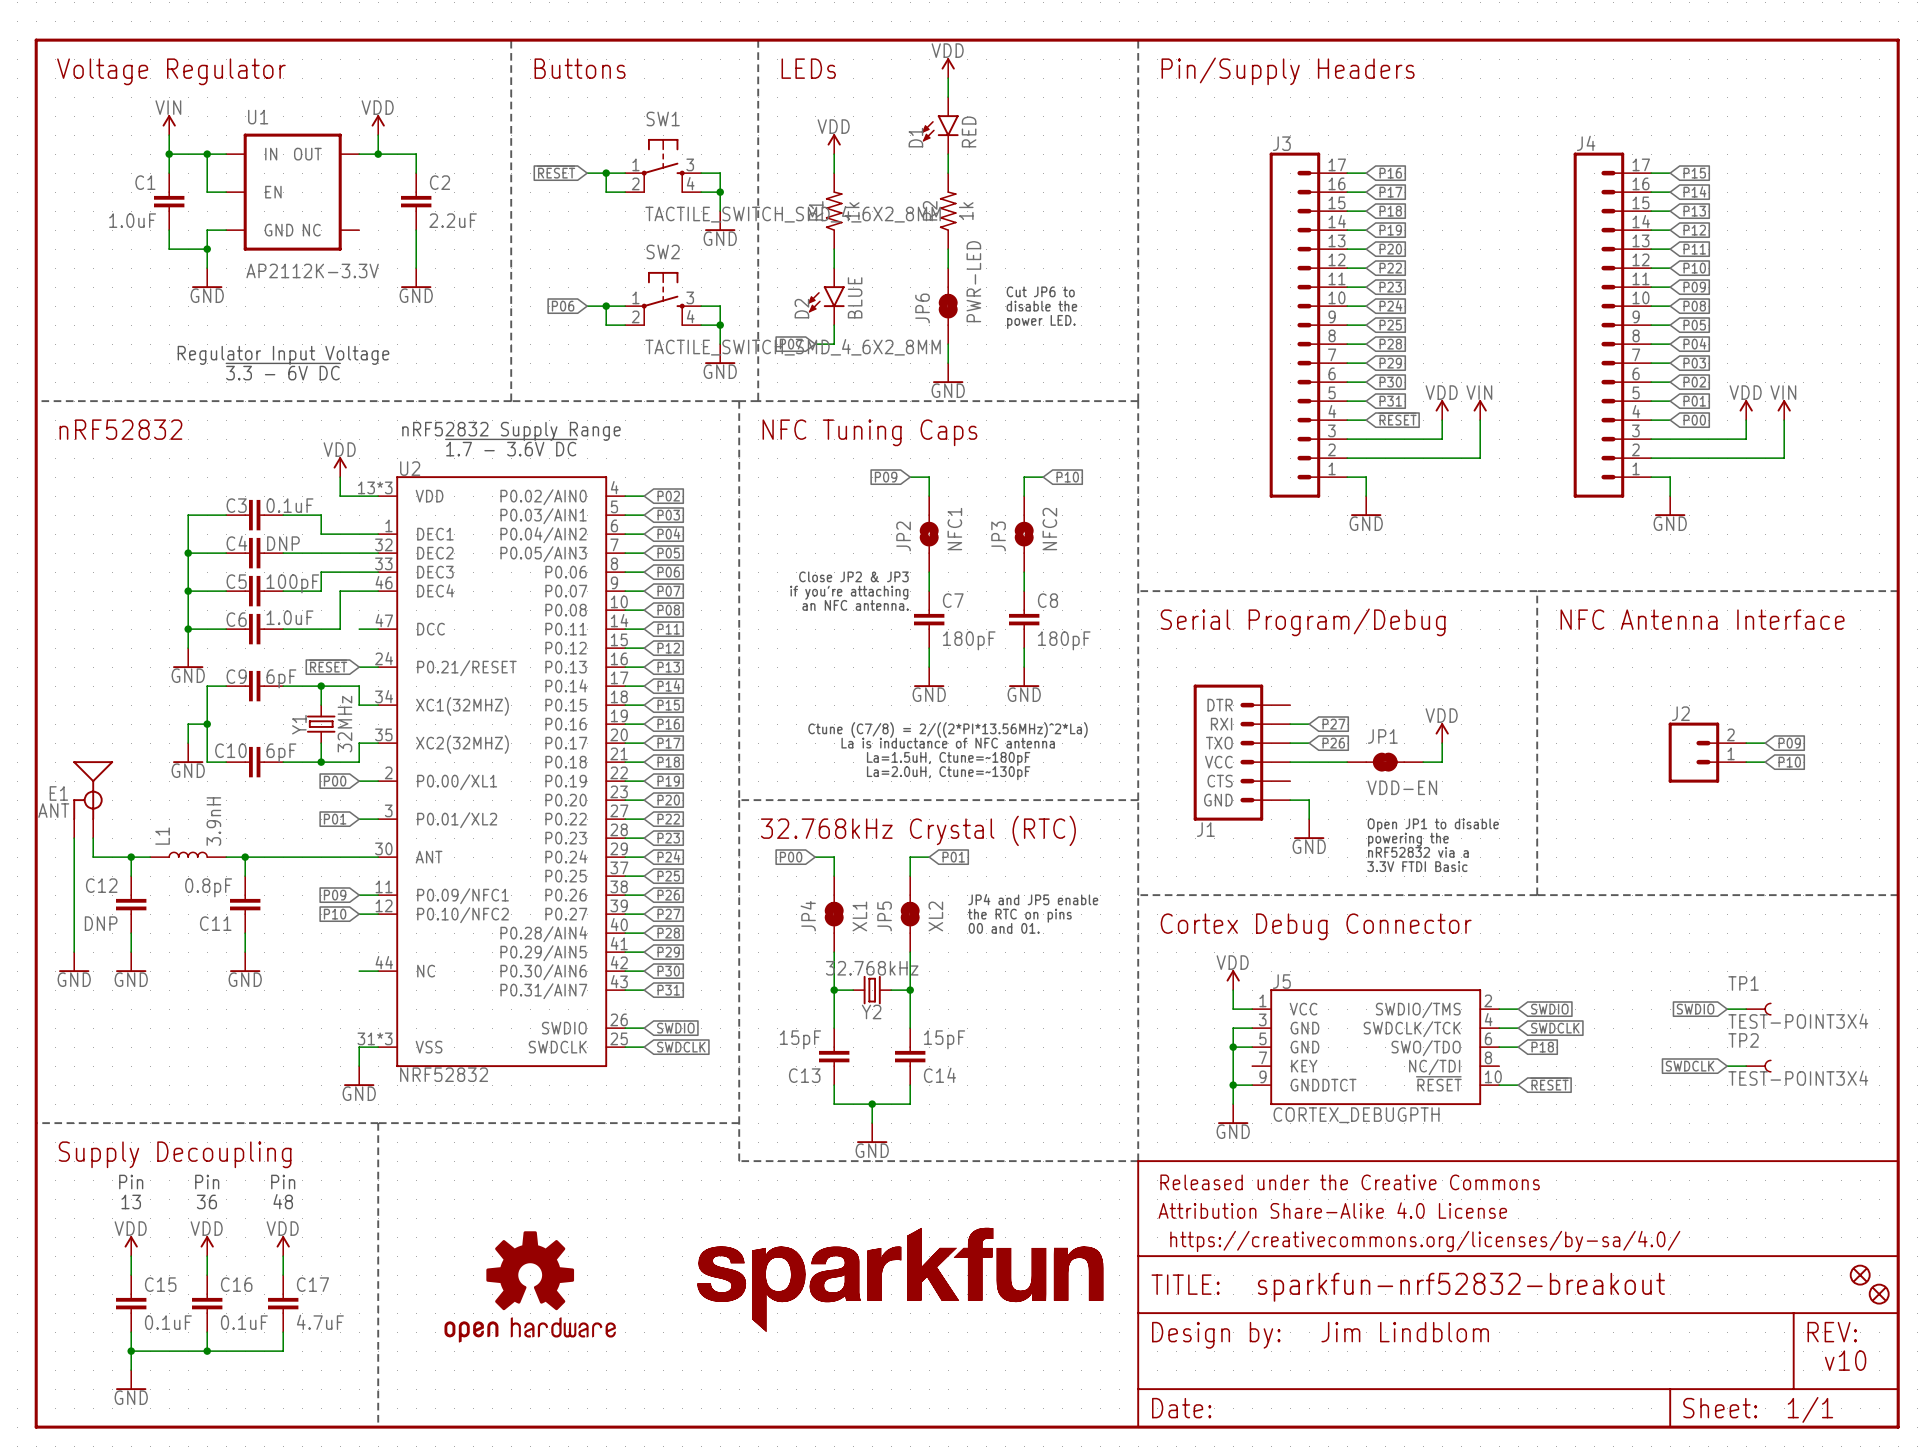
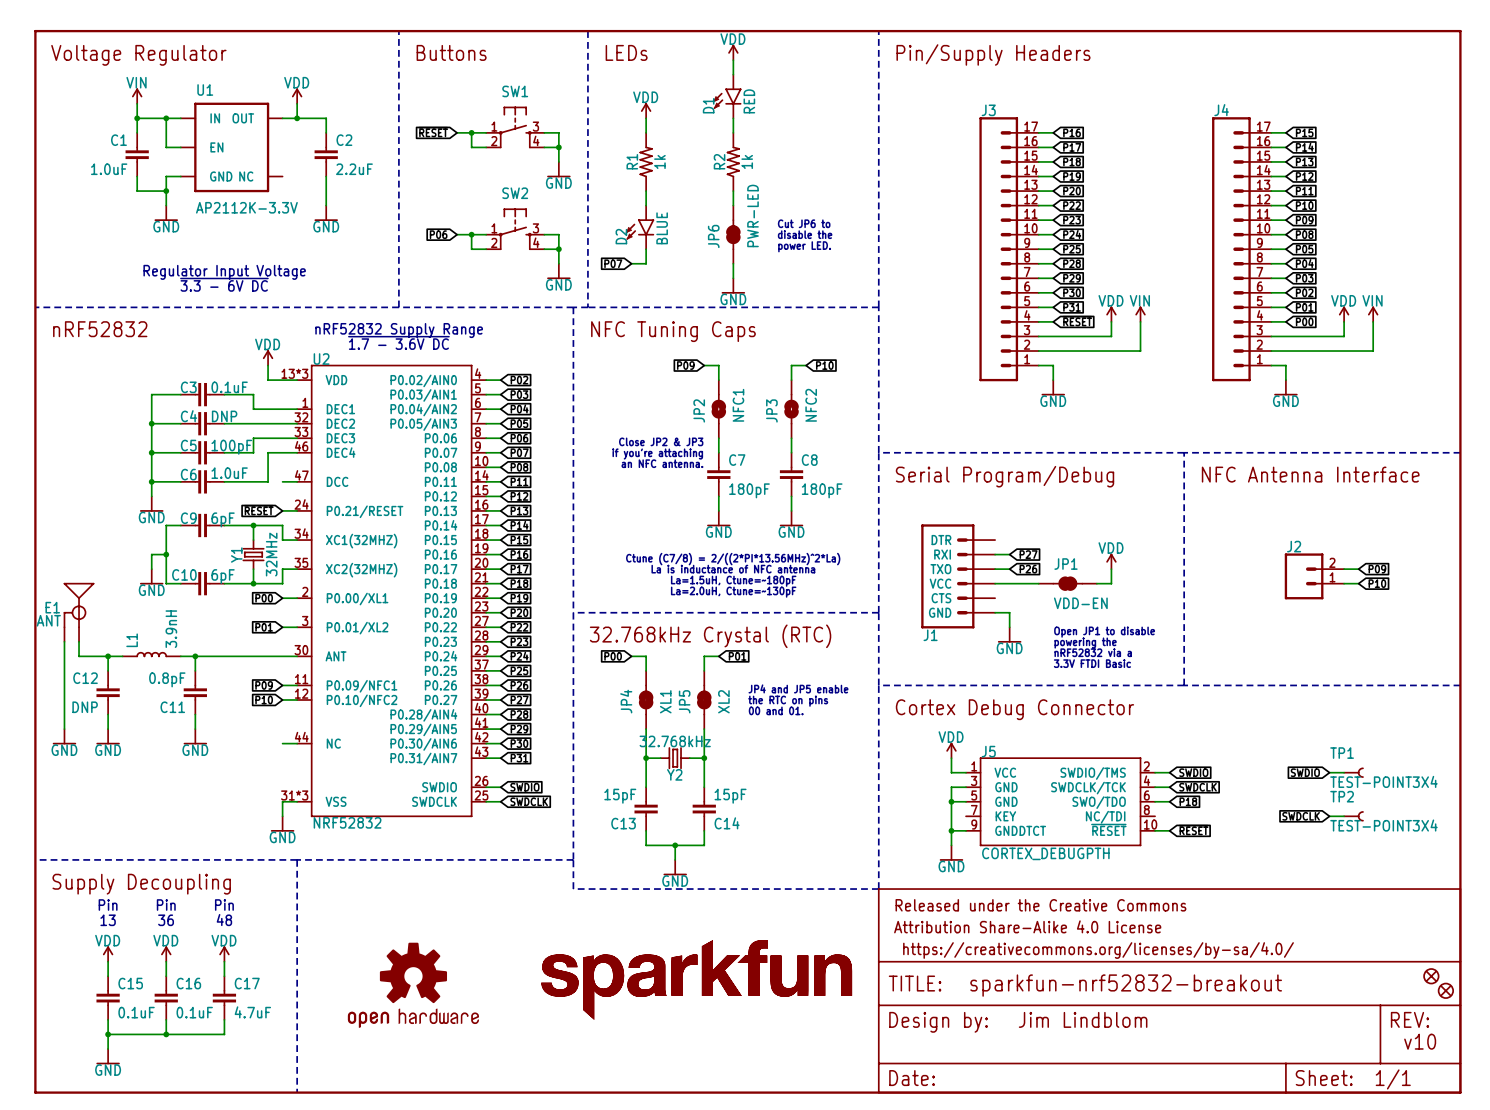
SW1 value: TACTILE_SWITCH_SMD_4_6X2_8MM (793, 214) -> none
SW2 value: TACTILE_SWITCH_SMD_4_6X2_8MM (793, 347) -> none

